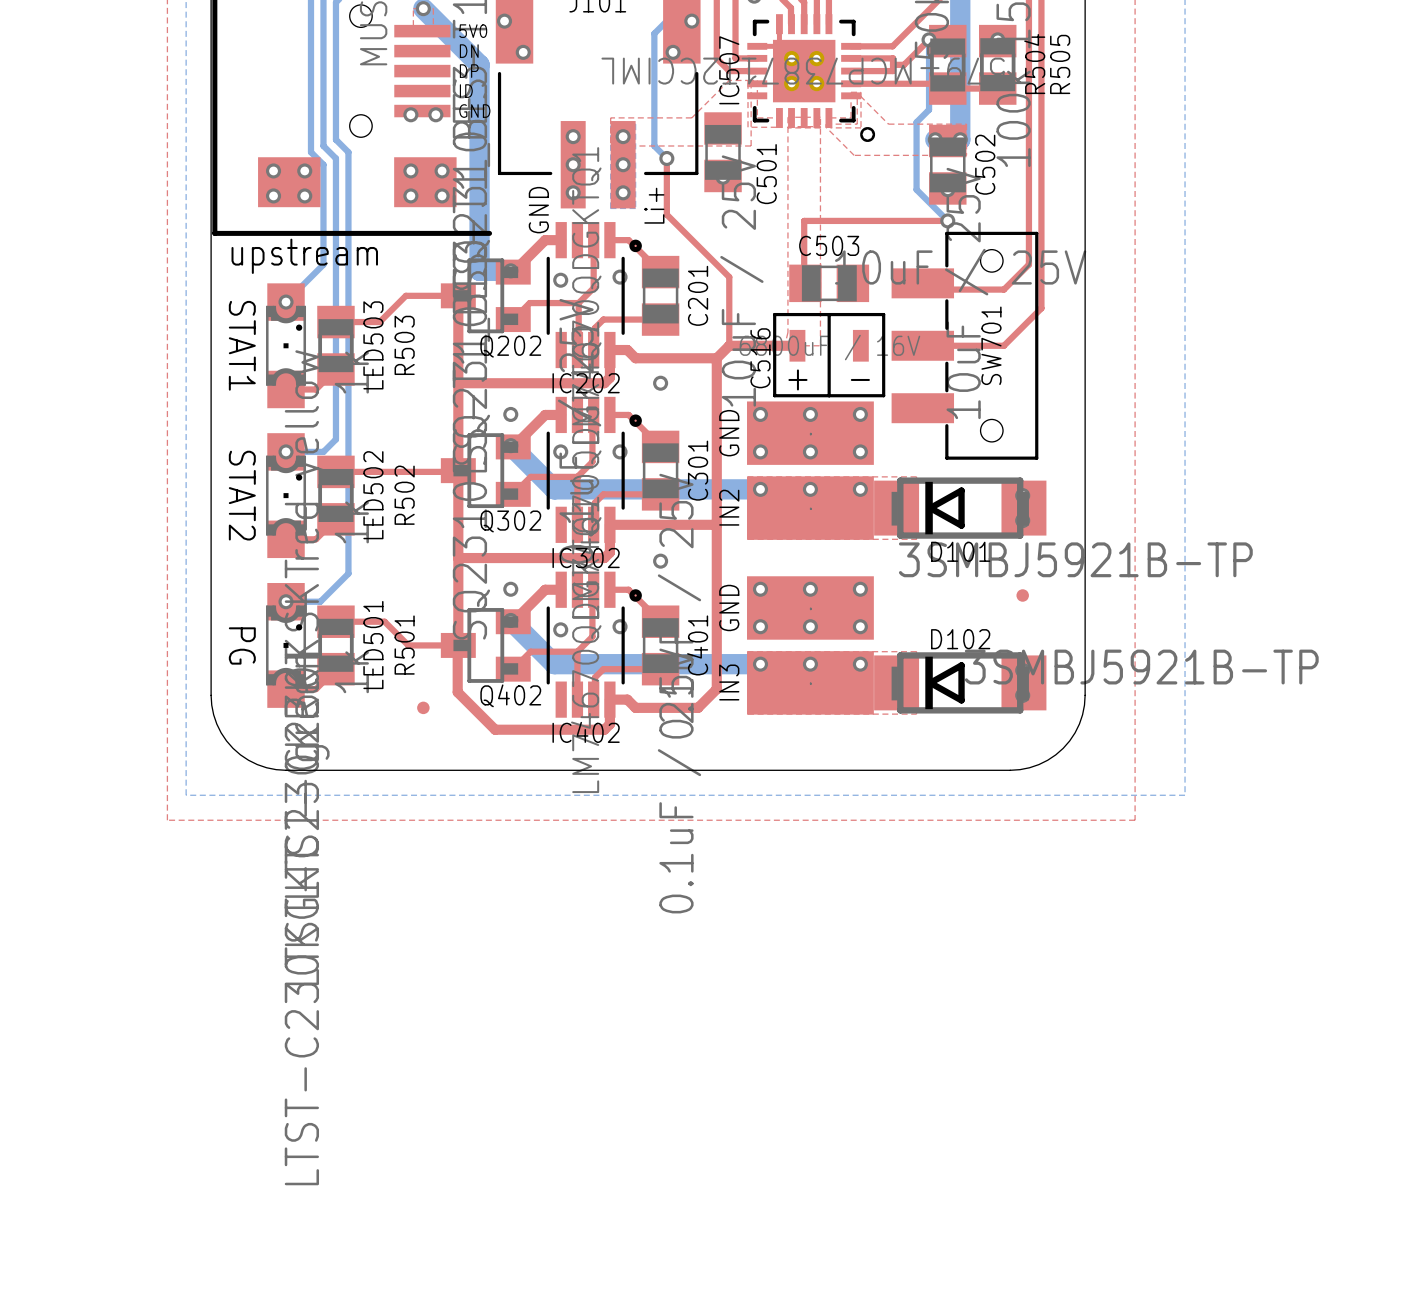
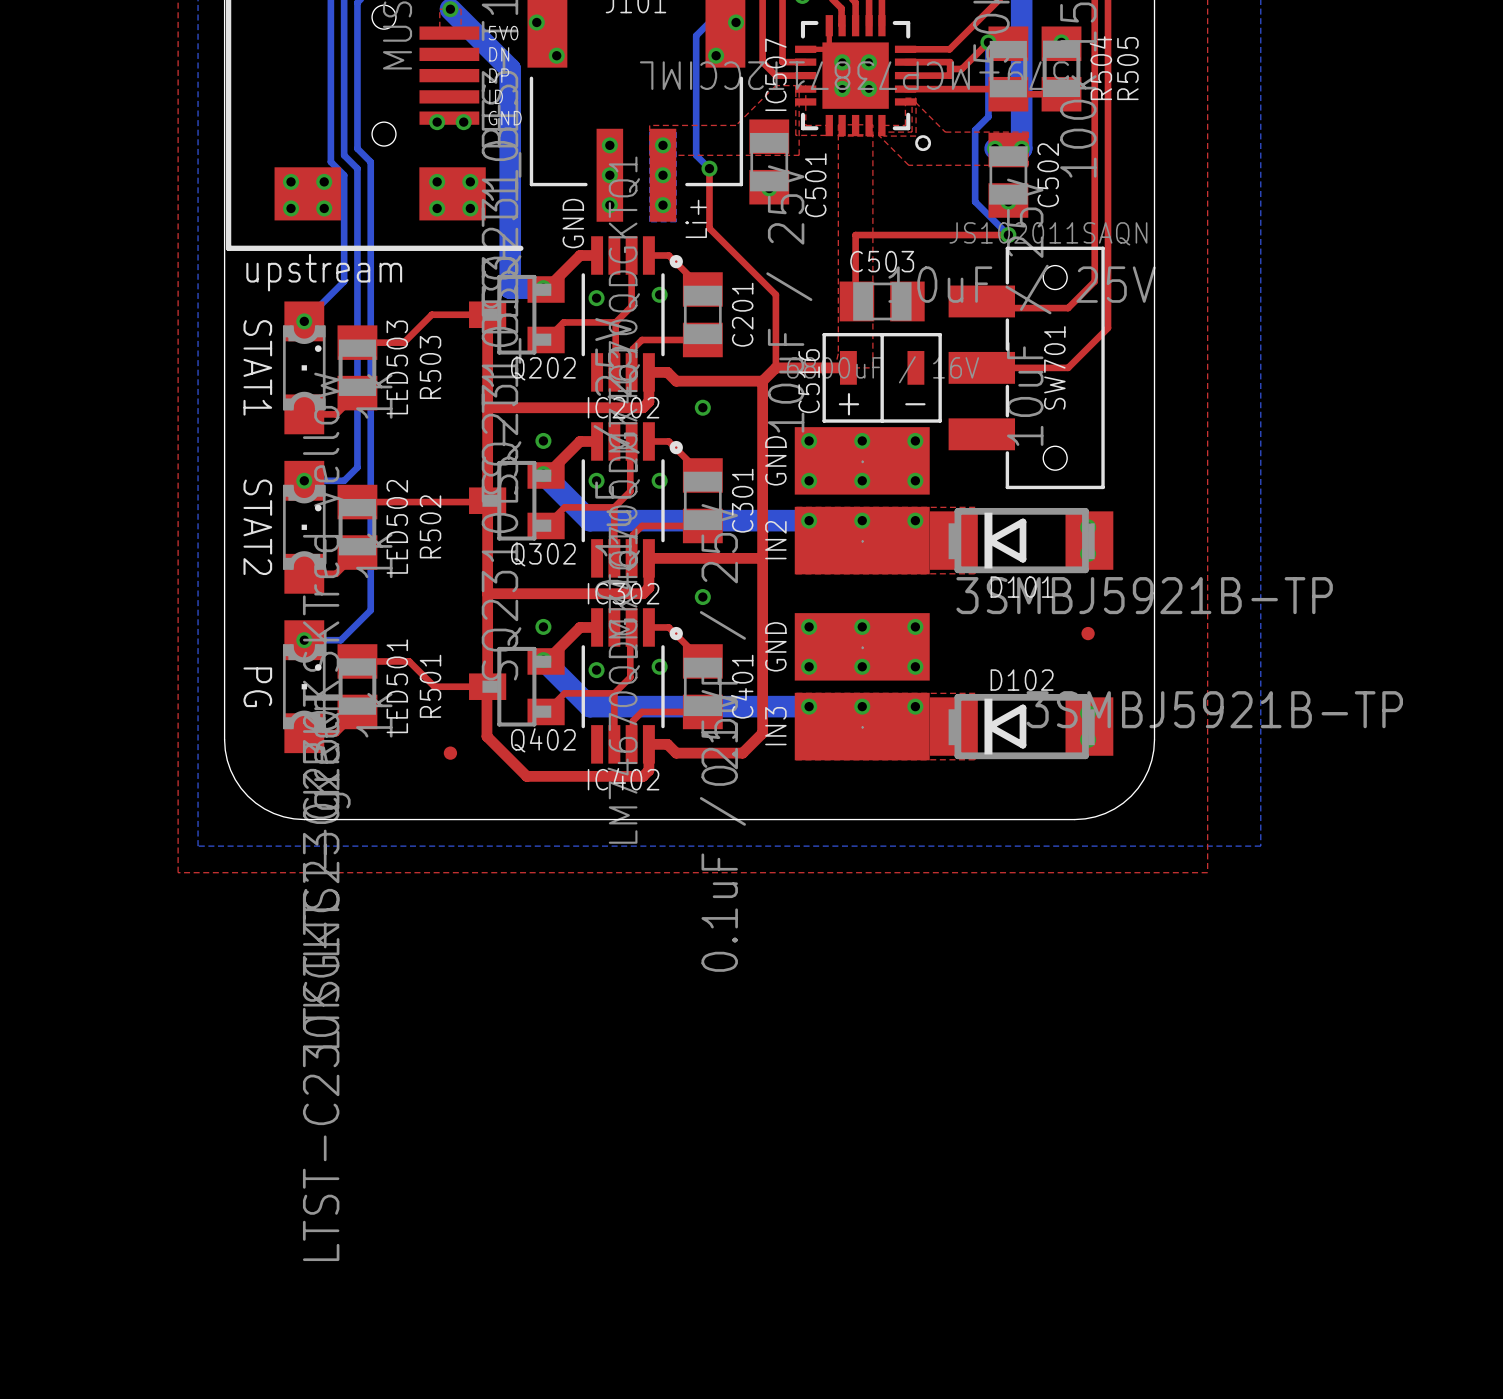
SW701 value: none -> JS102011SAQN (1048, 233)

